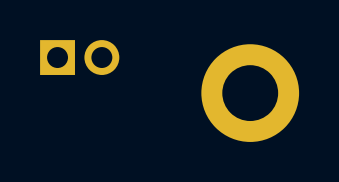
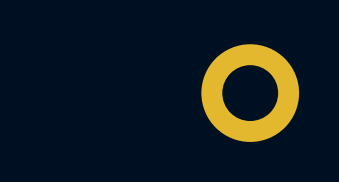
part: (79, 57) -> none

